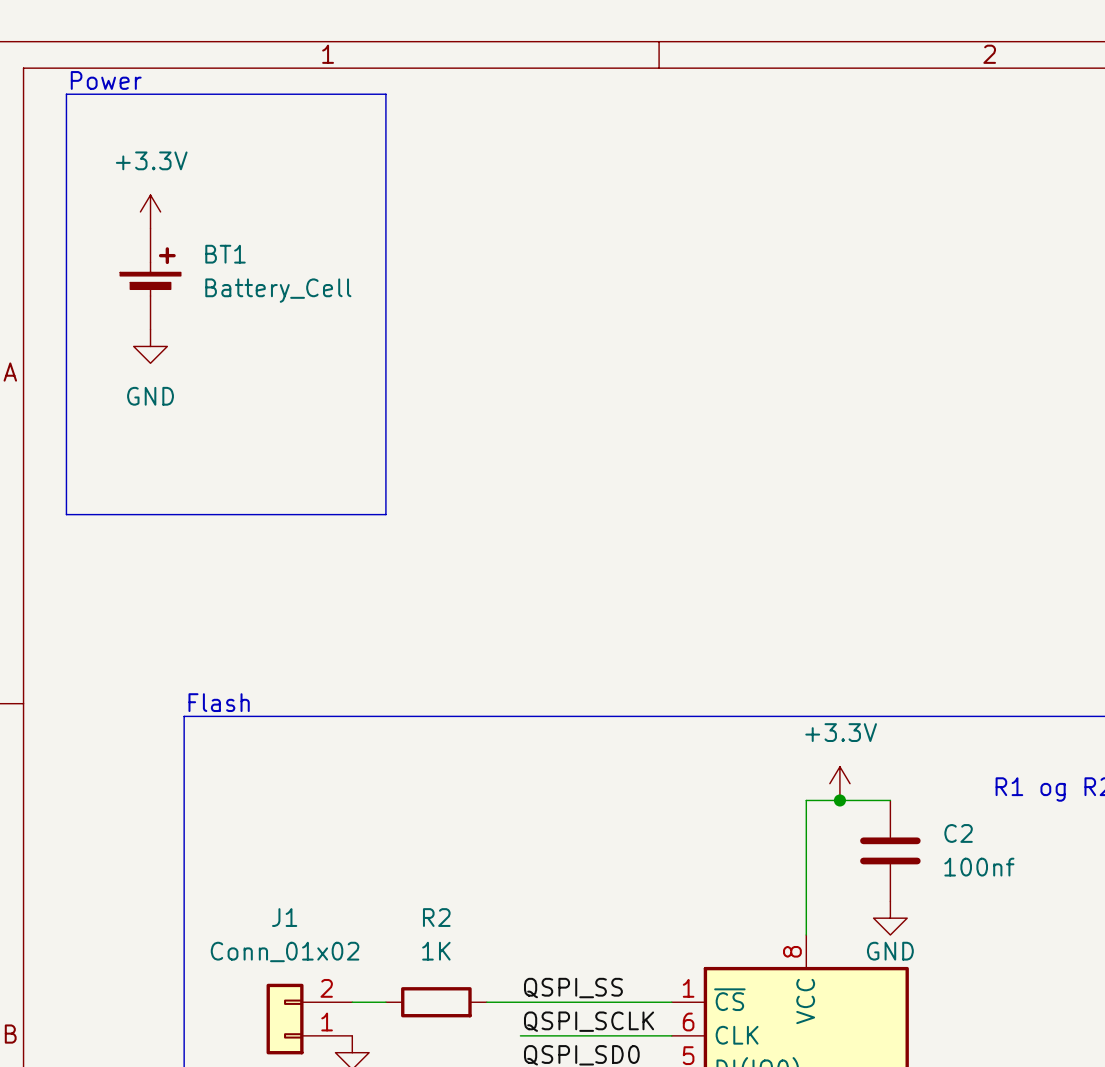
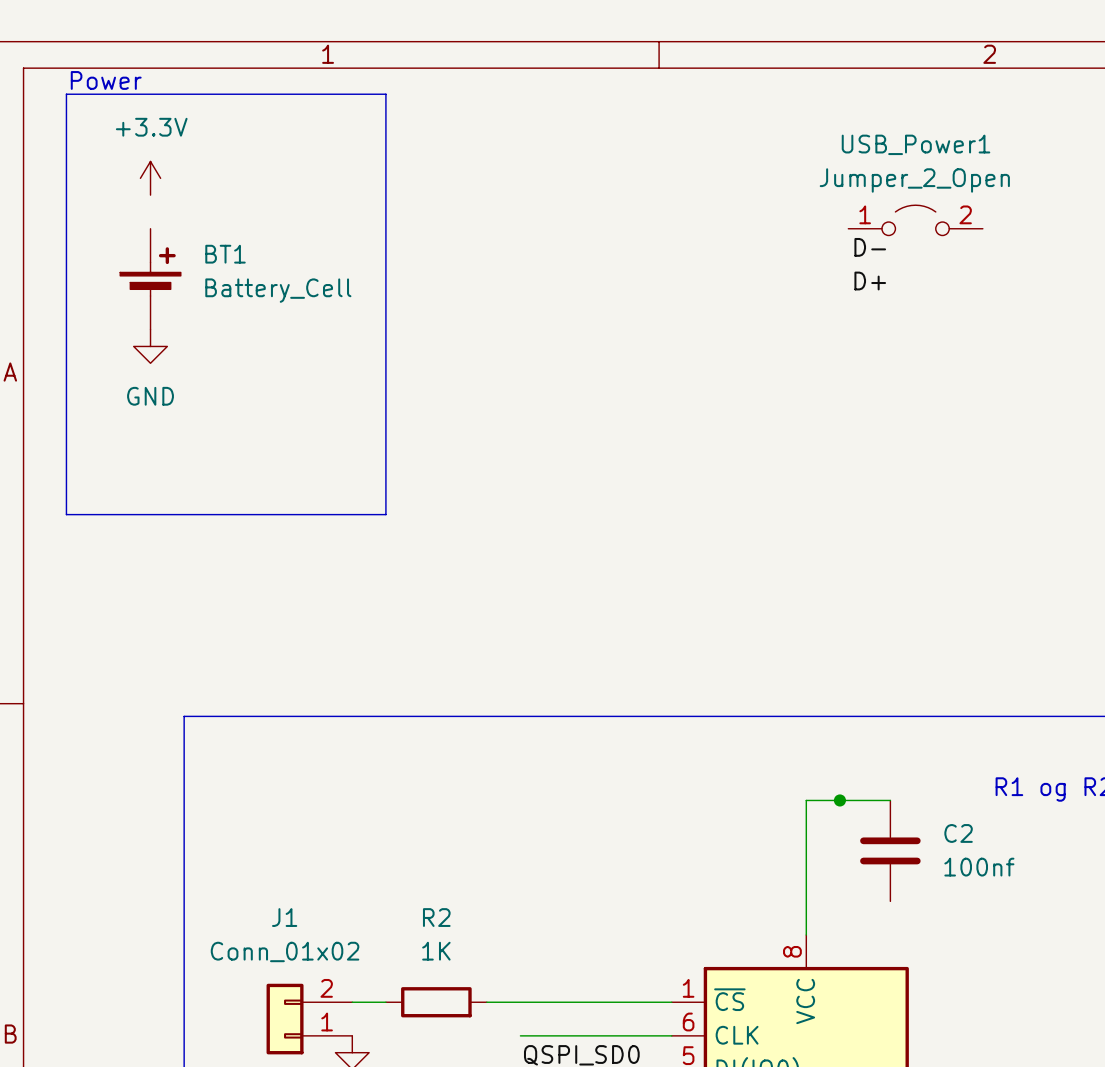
power symbol position: +3.3V (150, 211) -> +3.3V (150, 178)
USB_Power1: none -> Jumper_2_Open (915, 220)
label: none -> D- (870, 247)
label: none -> D+ (870, 281)
text: Flash (219, 702) -> none
power symbol: +3.3V (839, 783) -> none
power symbol: GND (890, 918) -> none
label: QSPI_SS (573, 988) -> none
label: QSPI_SCLK (589, 1021) -> none

